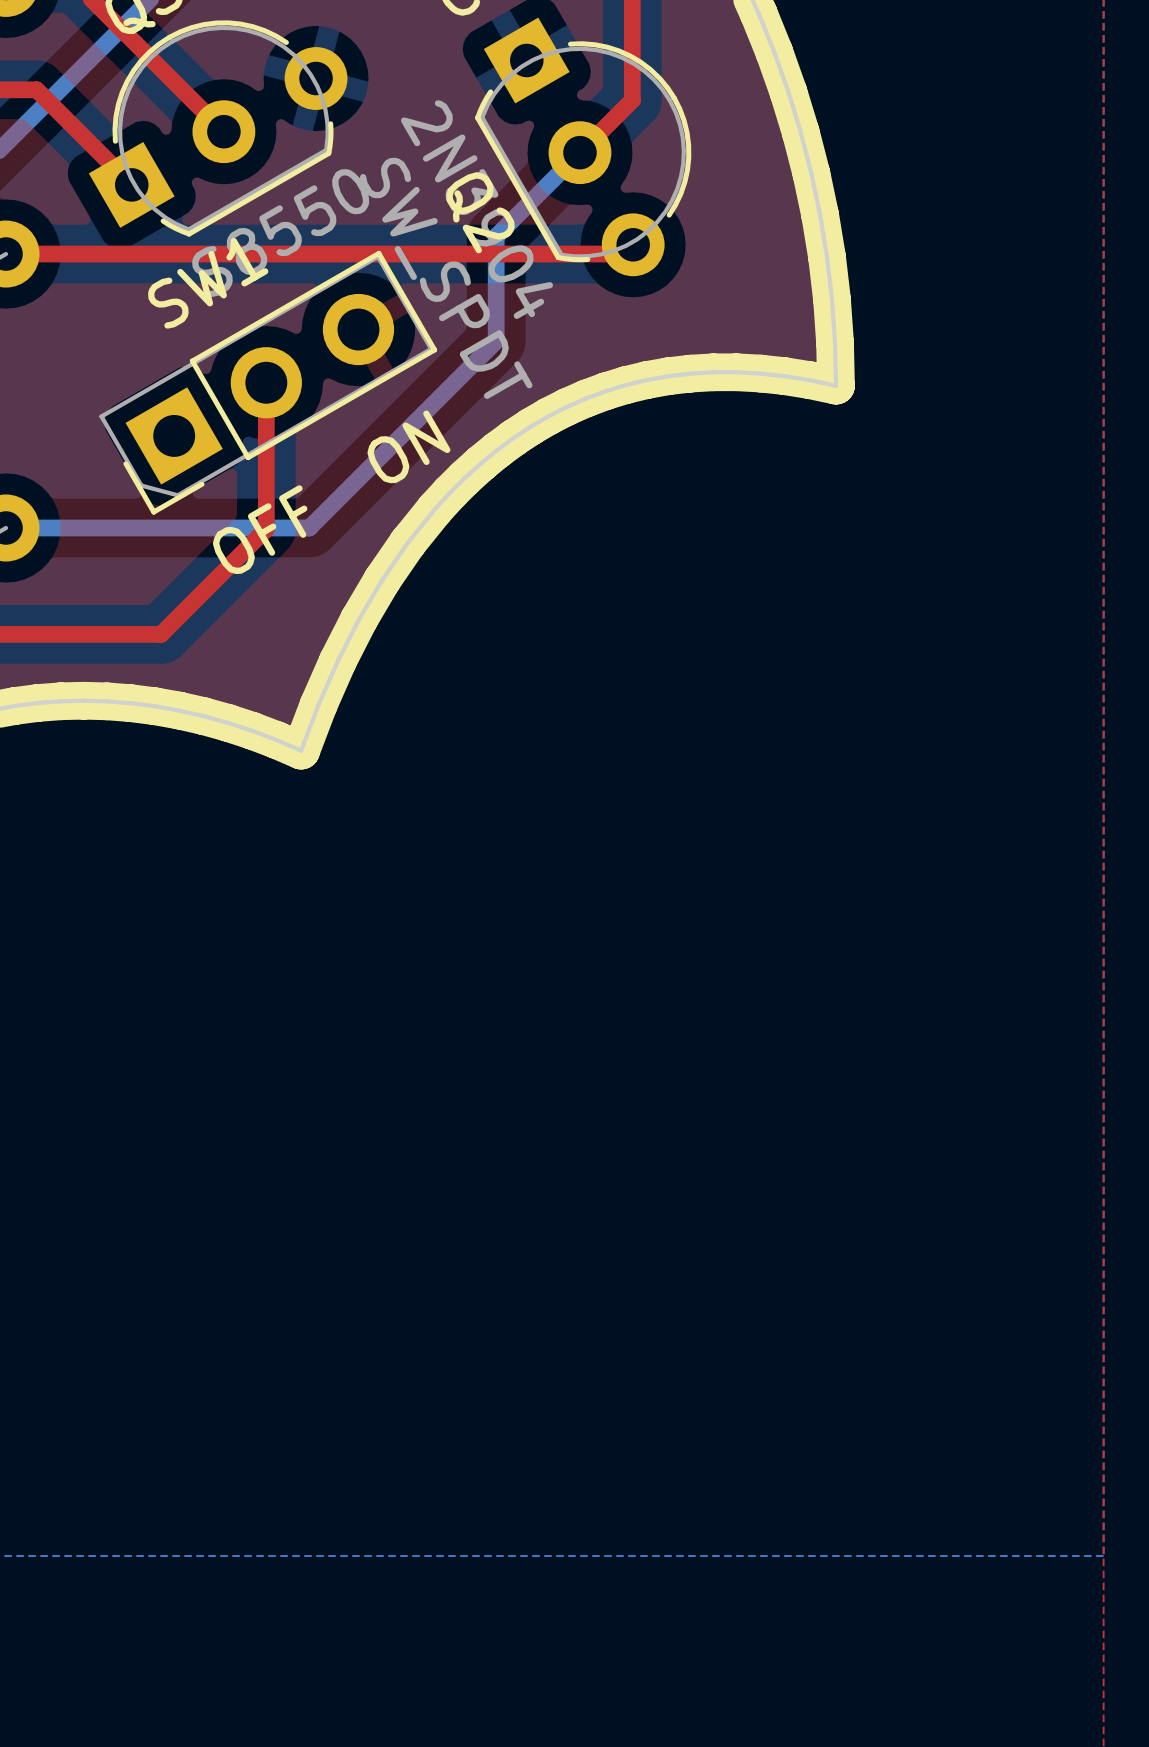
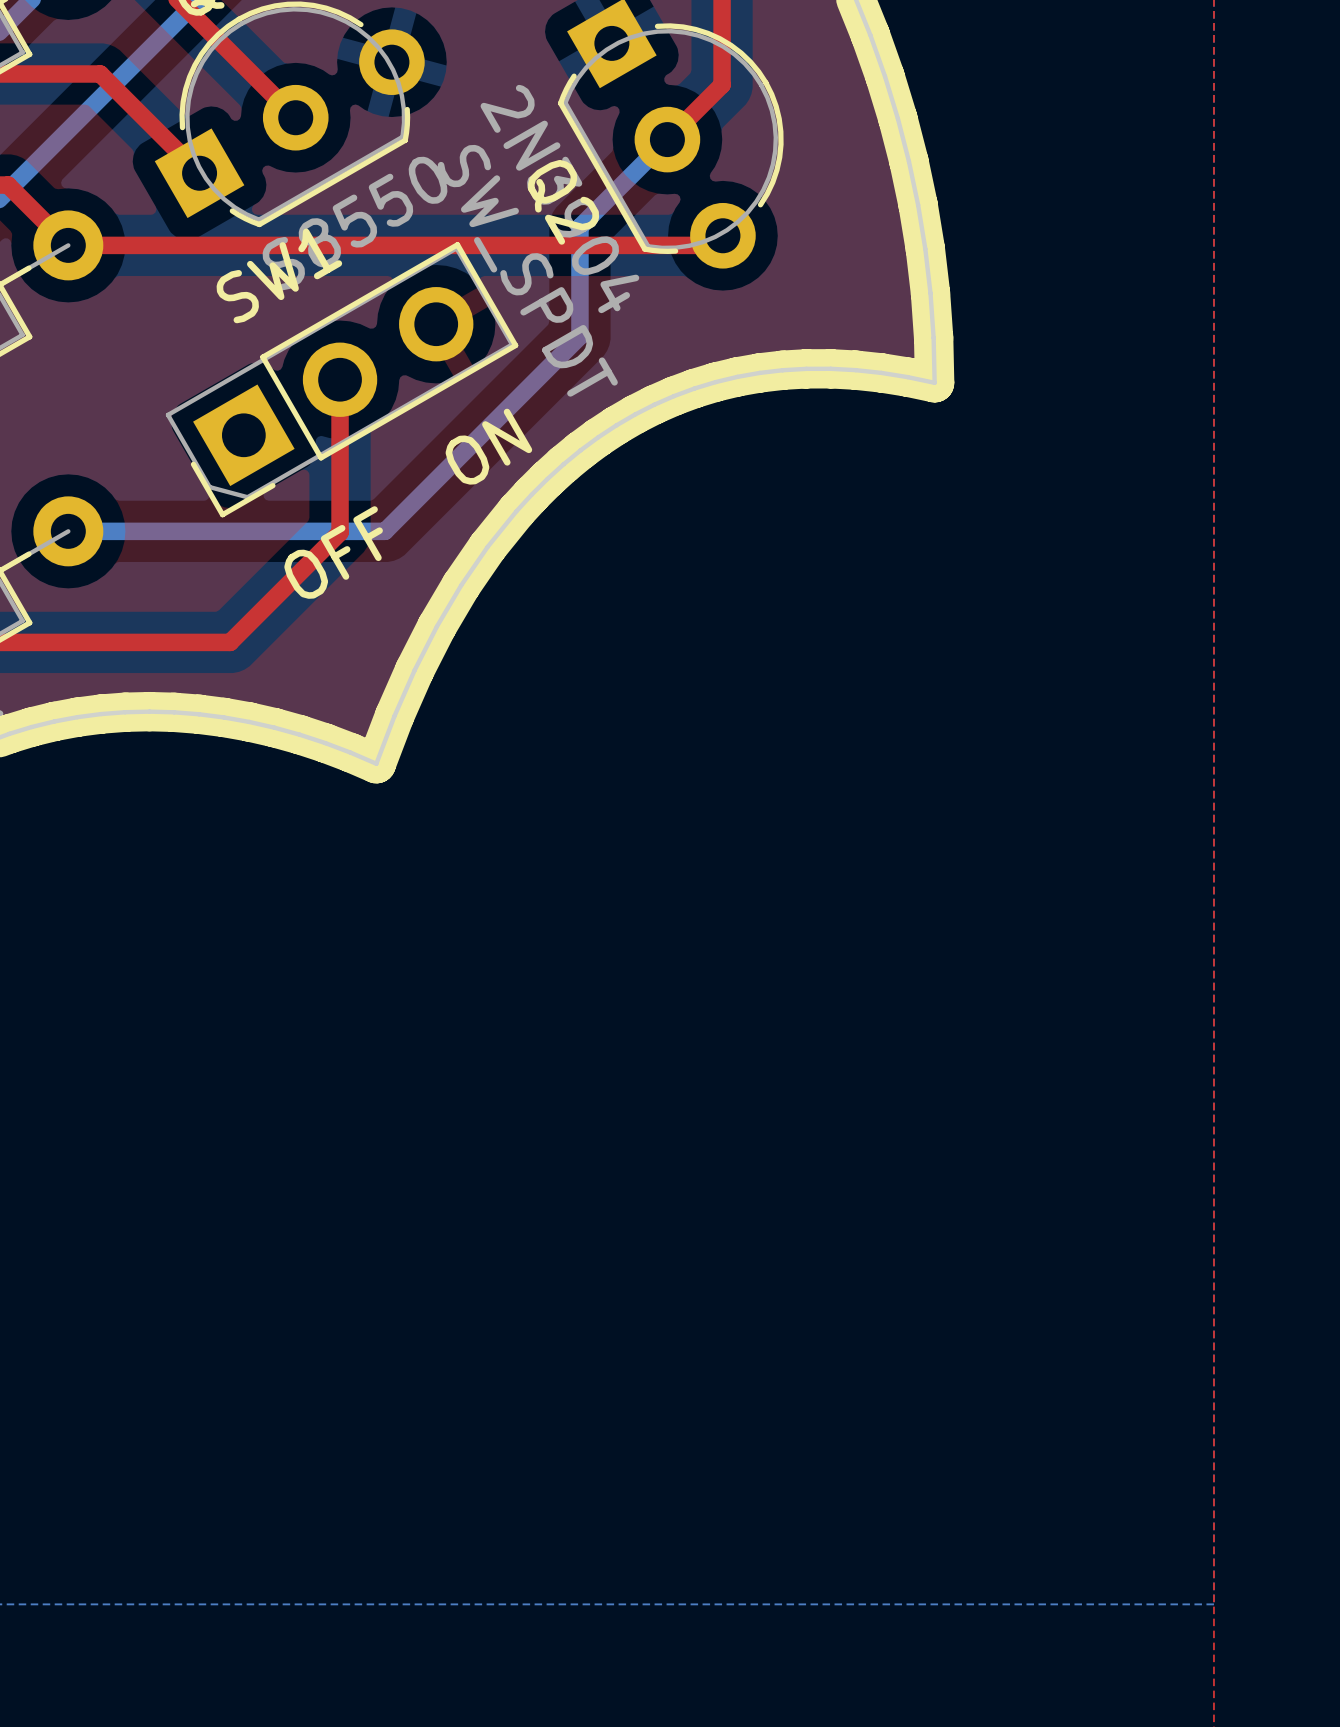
text position: OFF (260, 529) -> OFF (333, 552)

